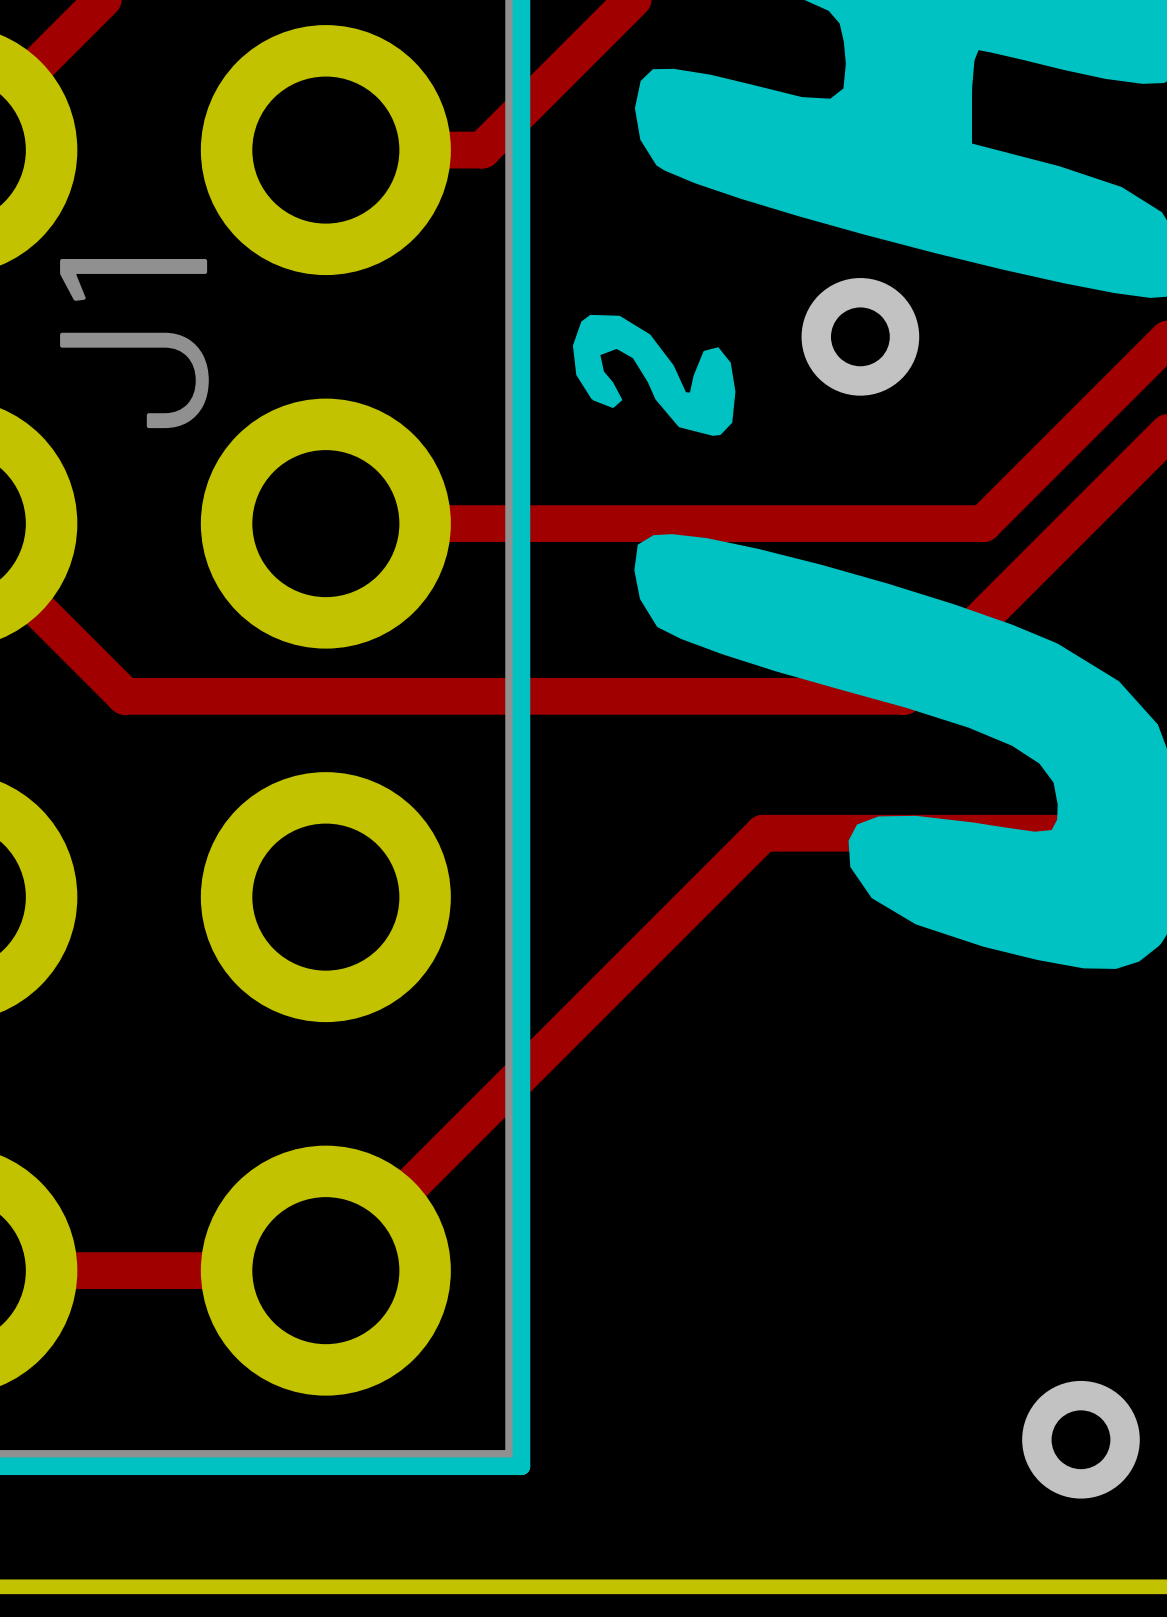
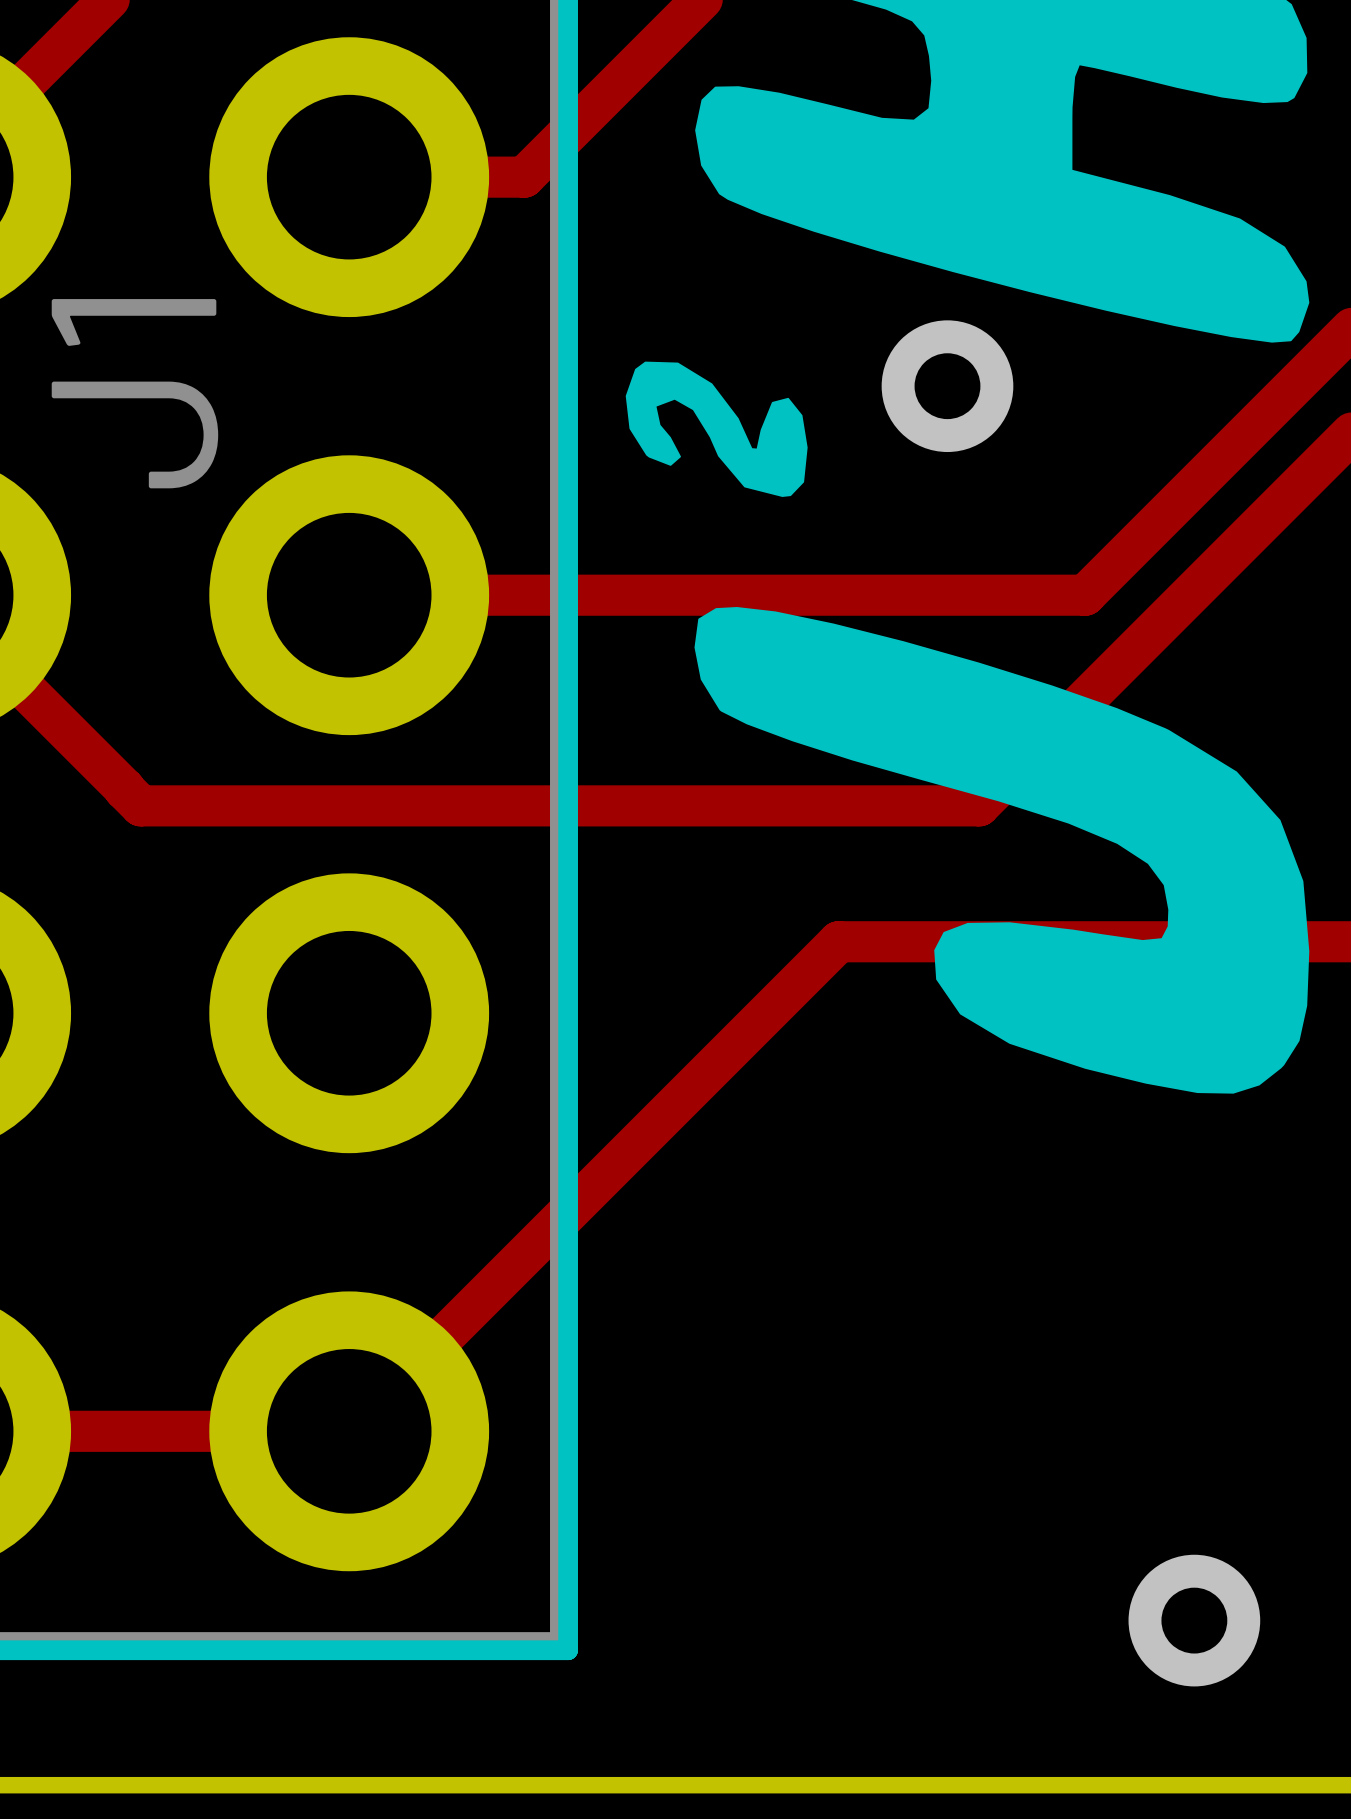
track: (125, 696) (904, 696) -> (124, 788) (141, 805) (979, 805) (996, 788)

